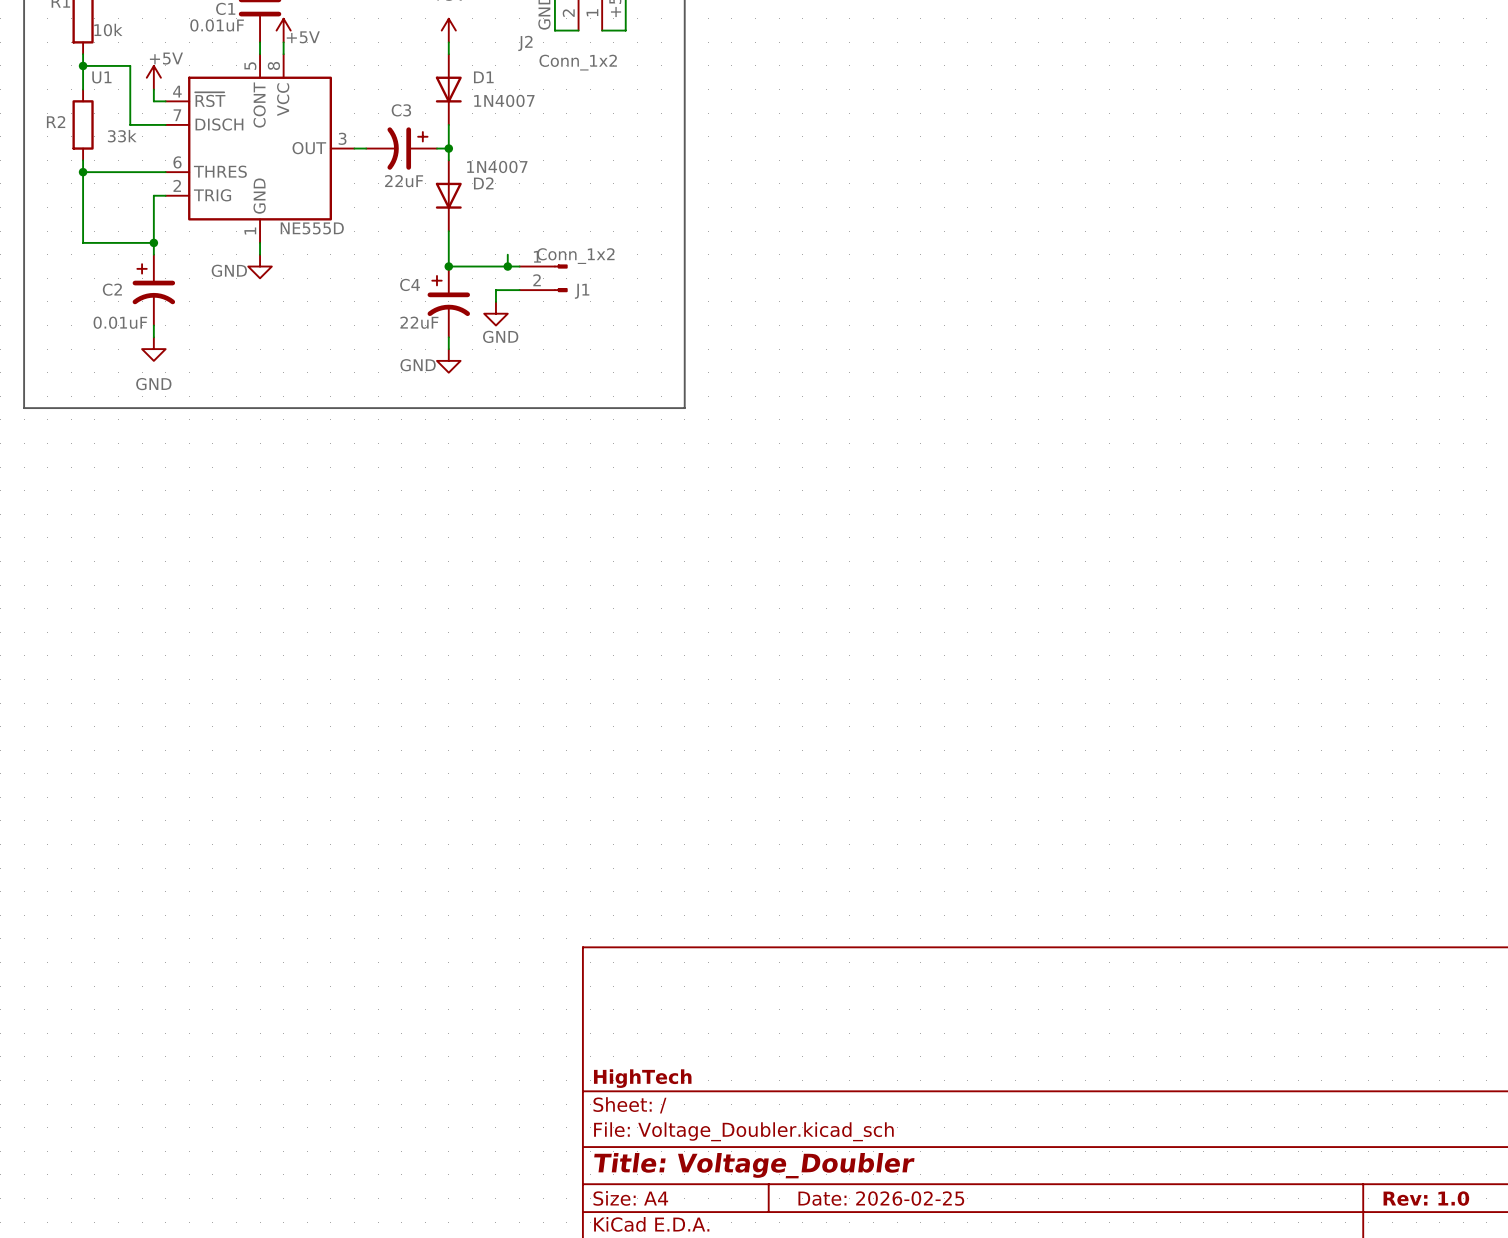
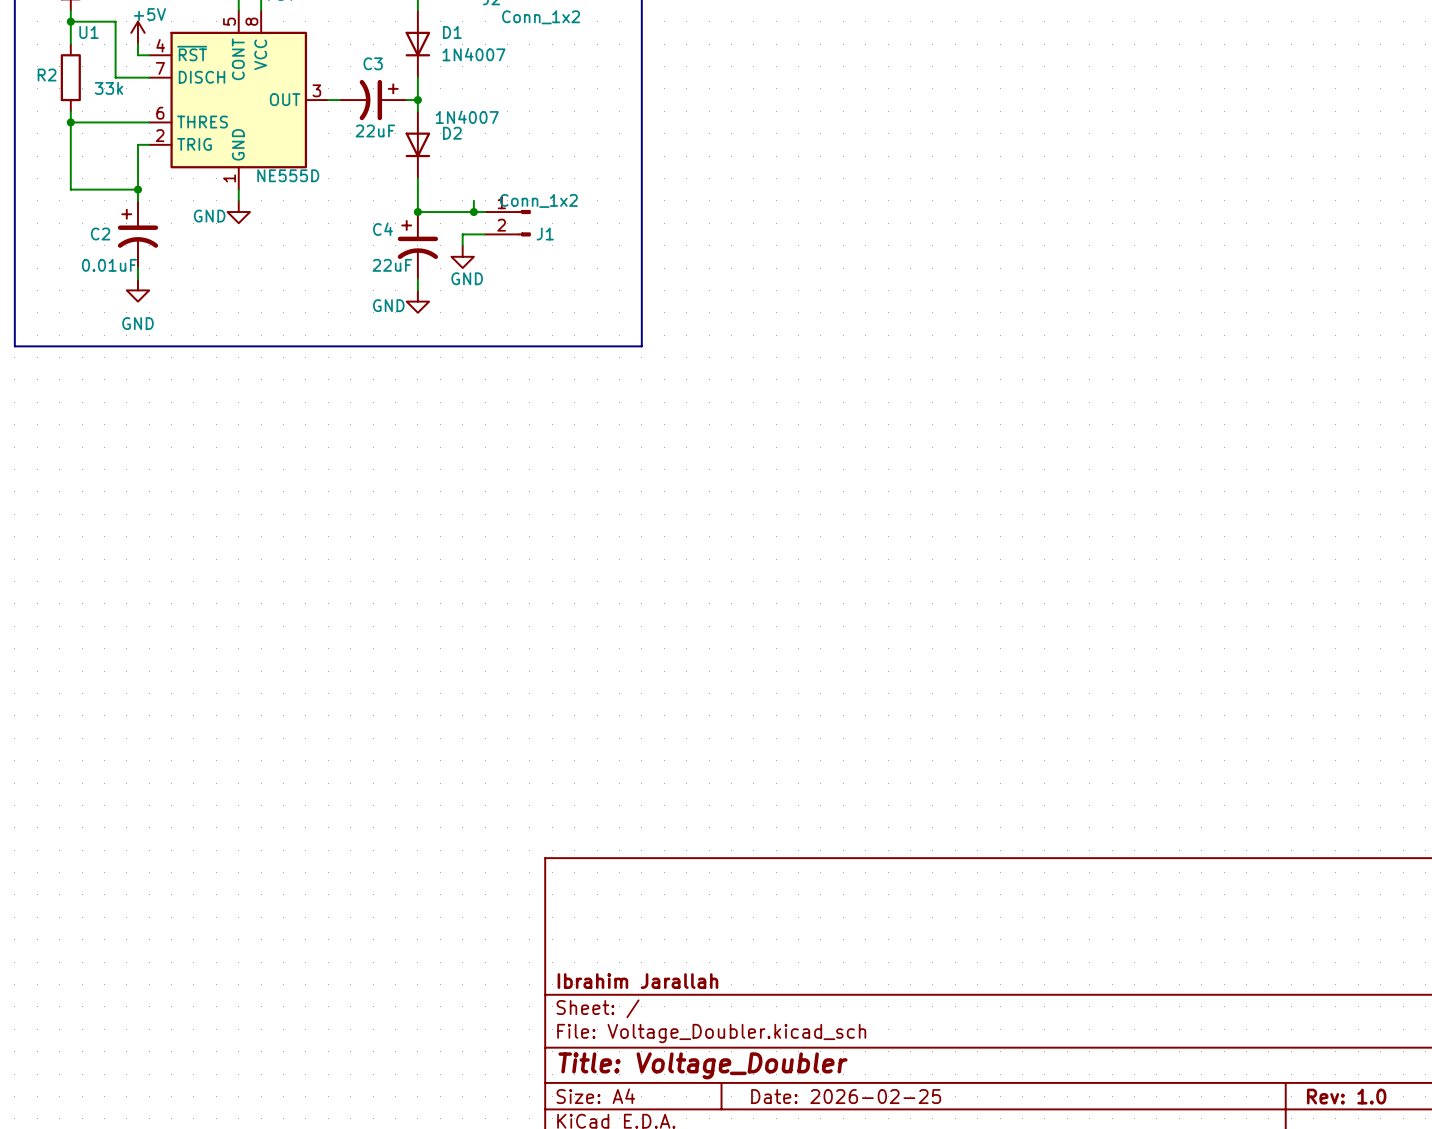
title block: HighTech (642, 1078) -> Ibrahim Jarallah (637, 981)

